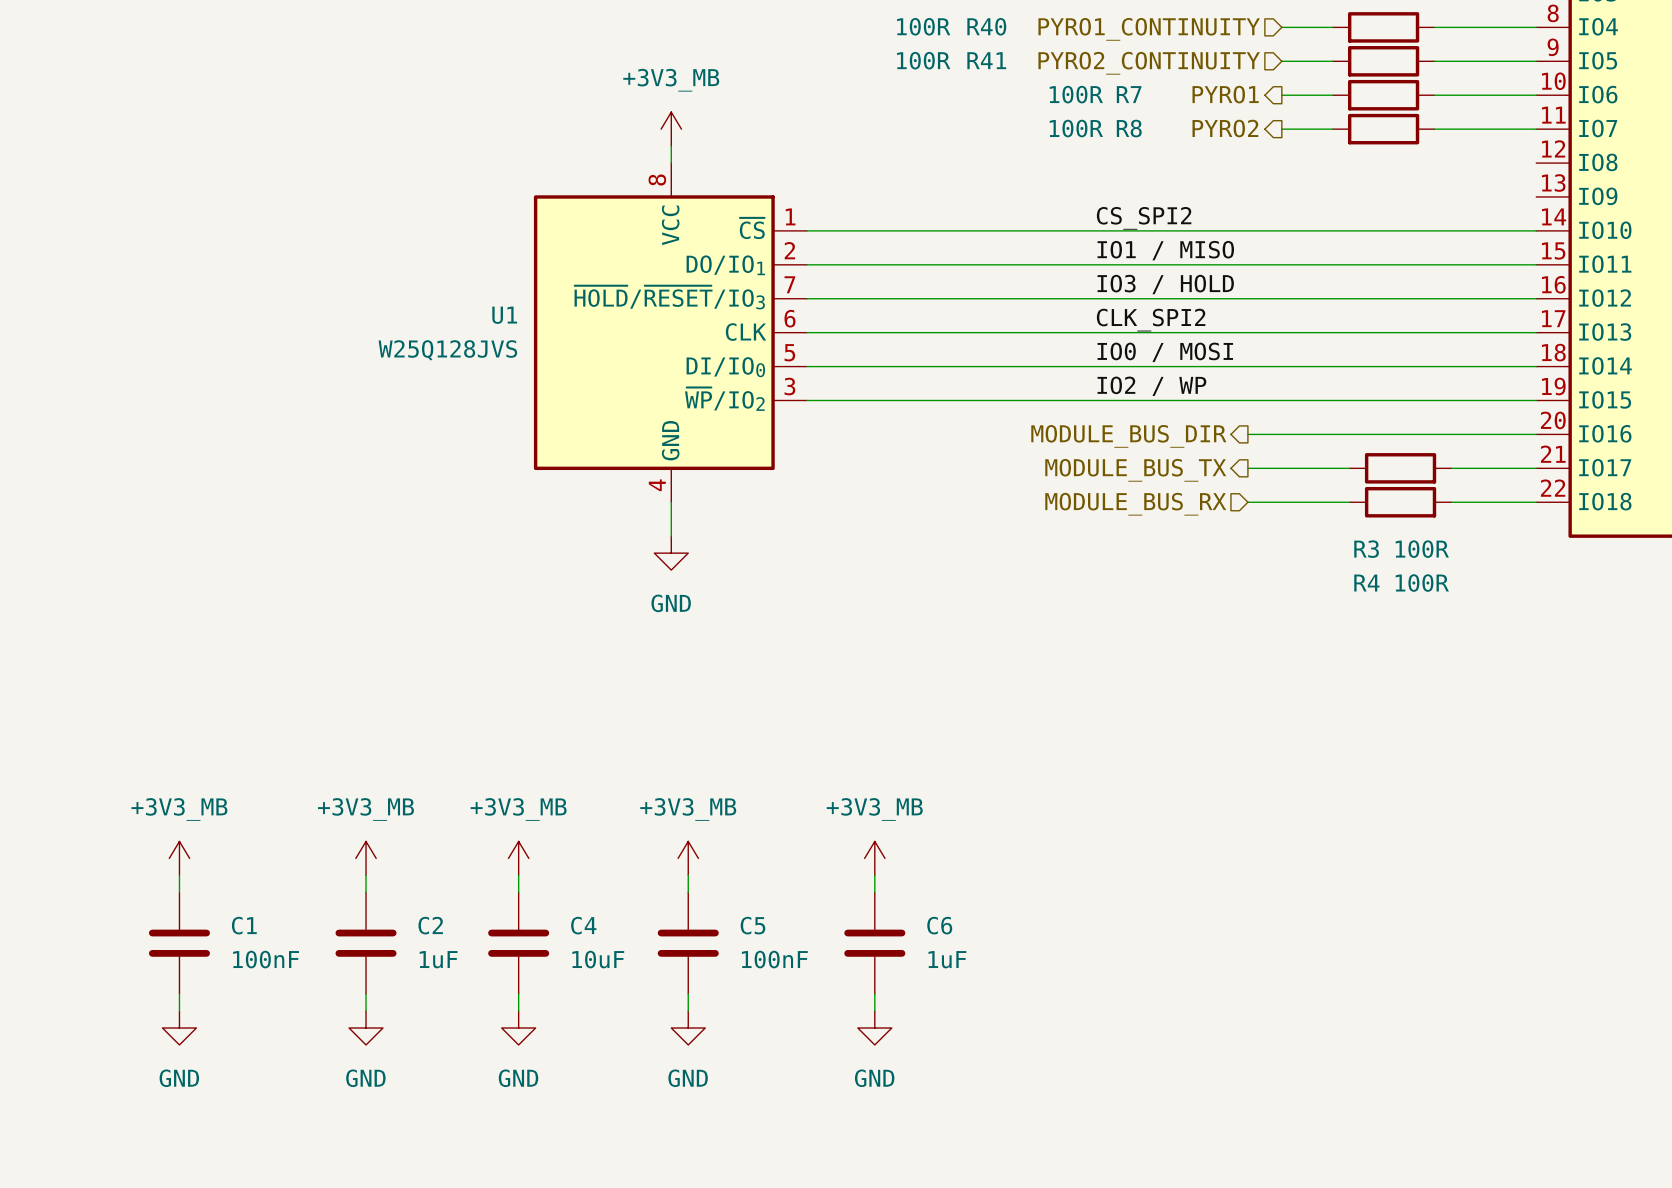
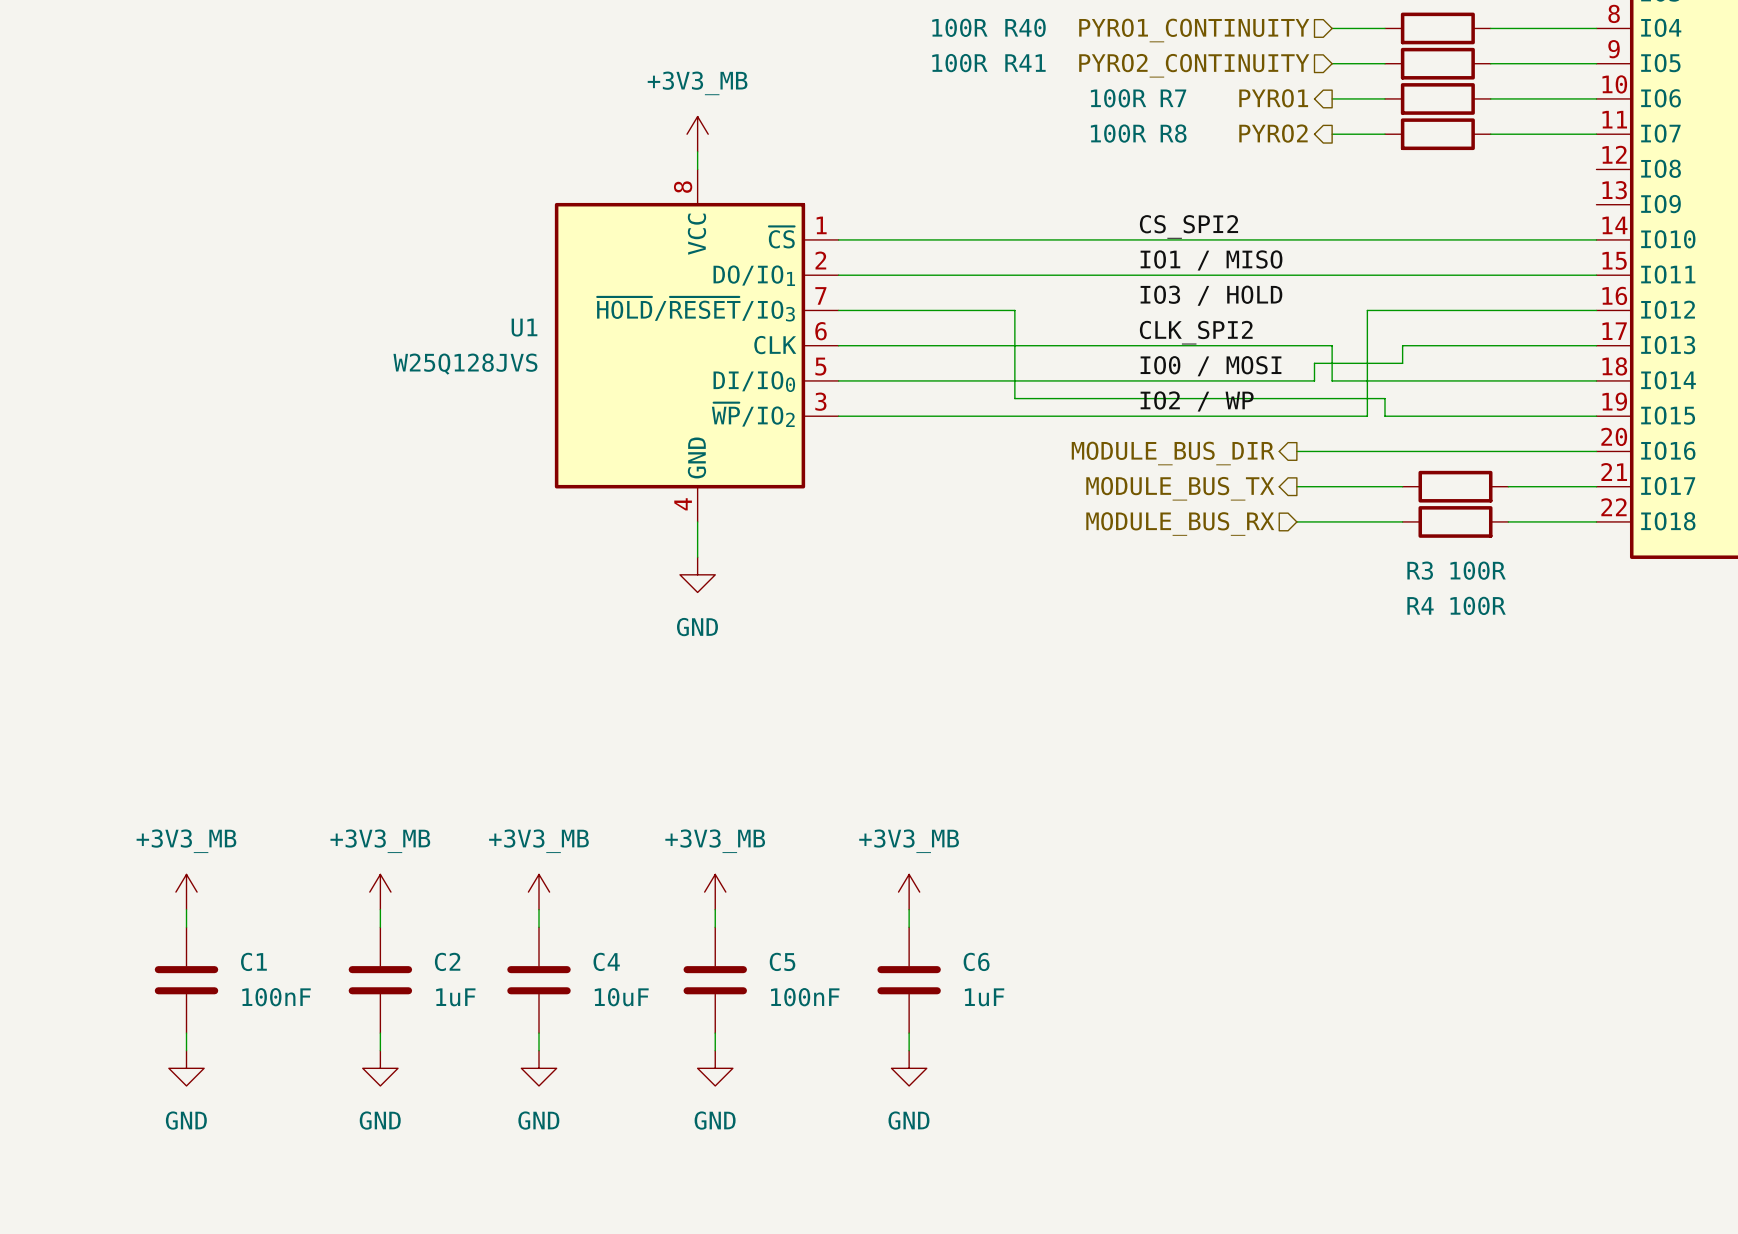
wire: (976, 298) (1315, 298) -> (1014, 310) (1014, 398) (1384, 398) (1384, 416)
wire: (1281, 332) (1349, 332) -> (1314, 380) (1314, 363) (1402, 363) (1402, 345)
wire: (1264, 366) (1281, 366) -> (1332, 345) (1332, 380)
wire: (1315, 400) (1332, 400) -> (1367, 416) (1367, 310)

